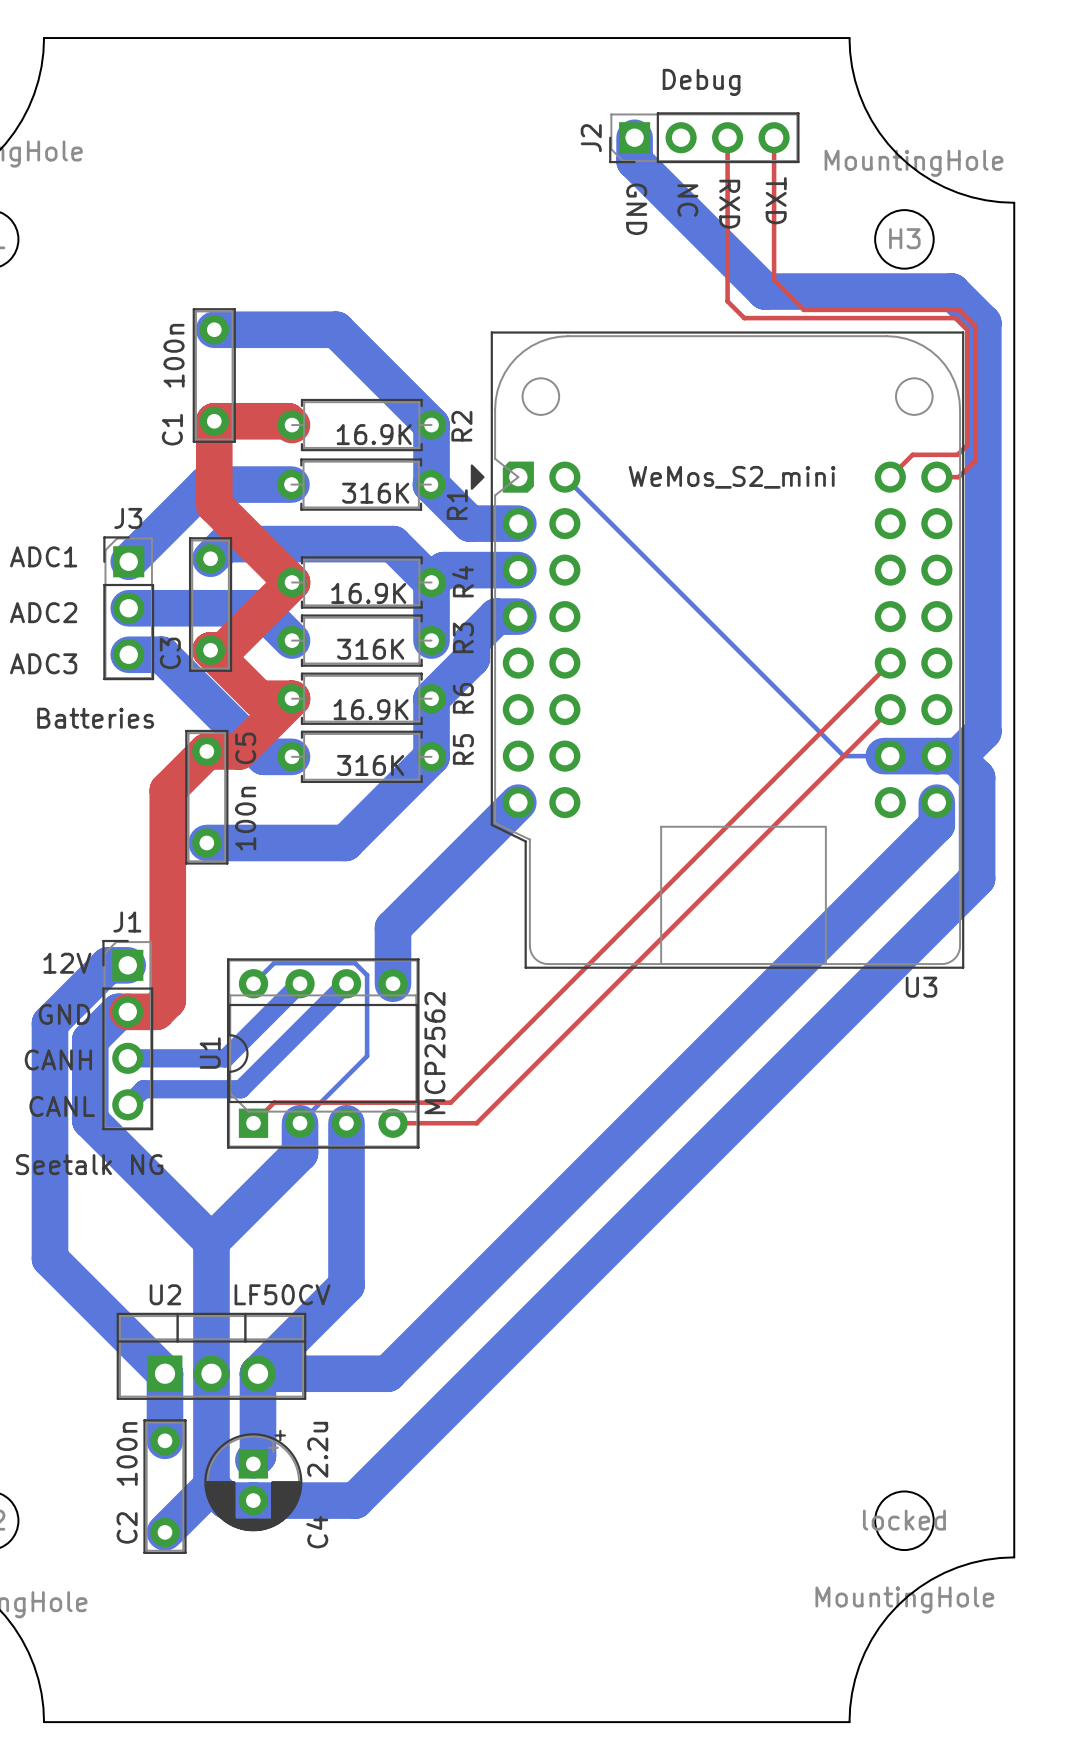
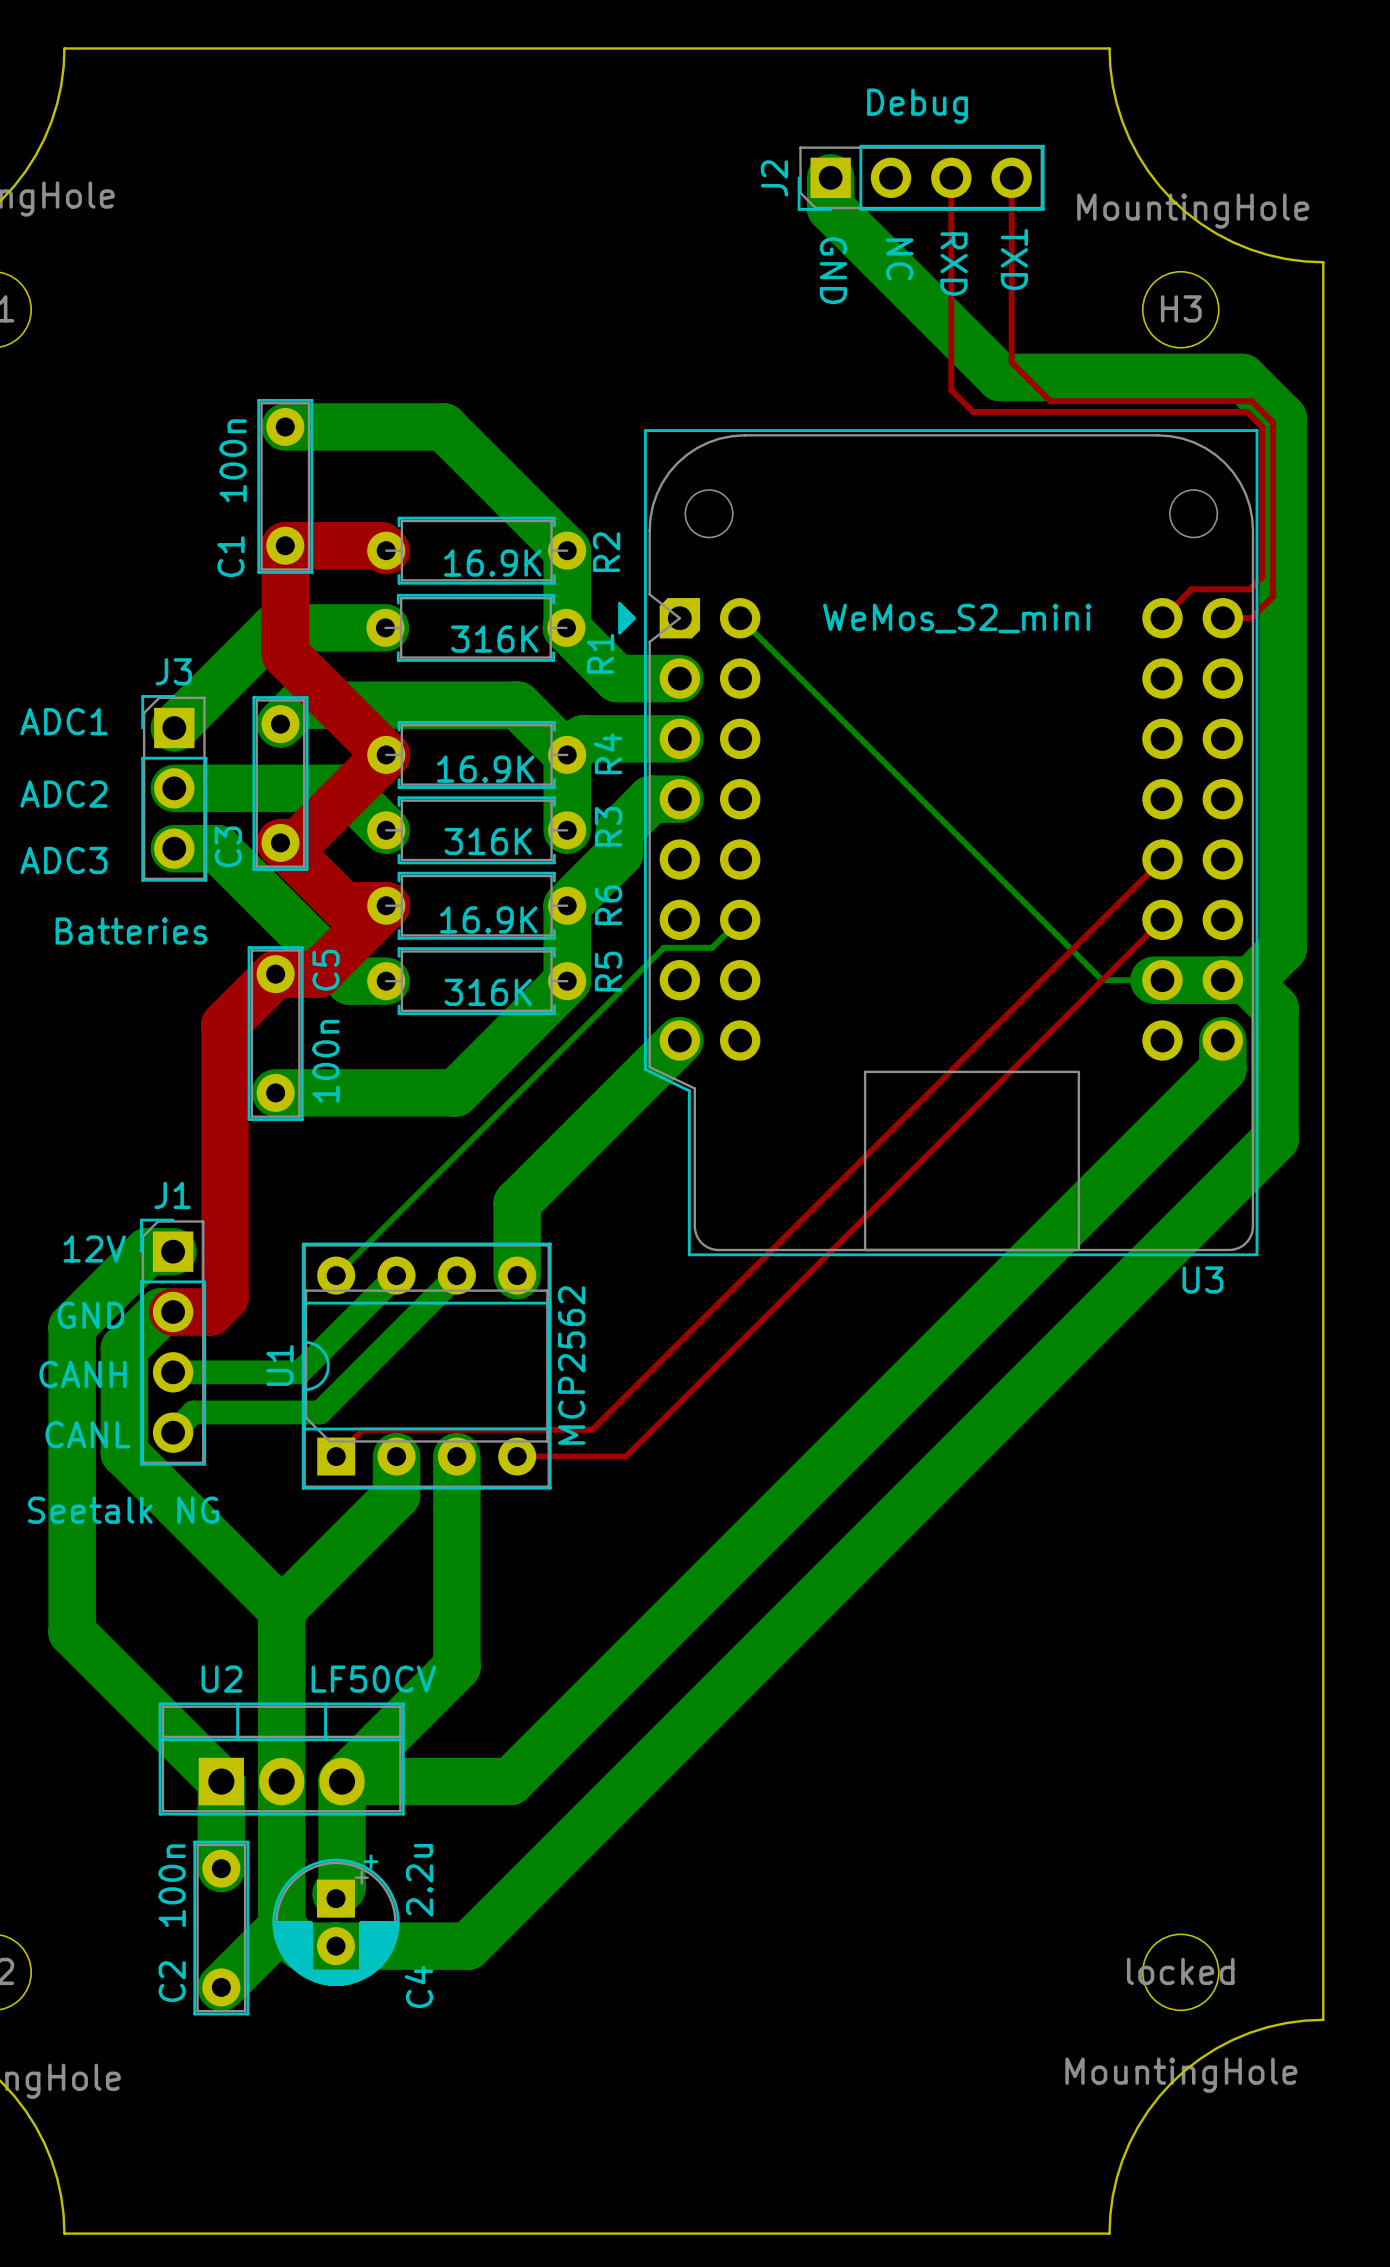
bottom track: (274, 963) (355, 963) (367, 975) (367, 1056) (300, 1123) -> (362, 1248) (664, 947) (712, 947) (740, 919)

